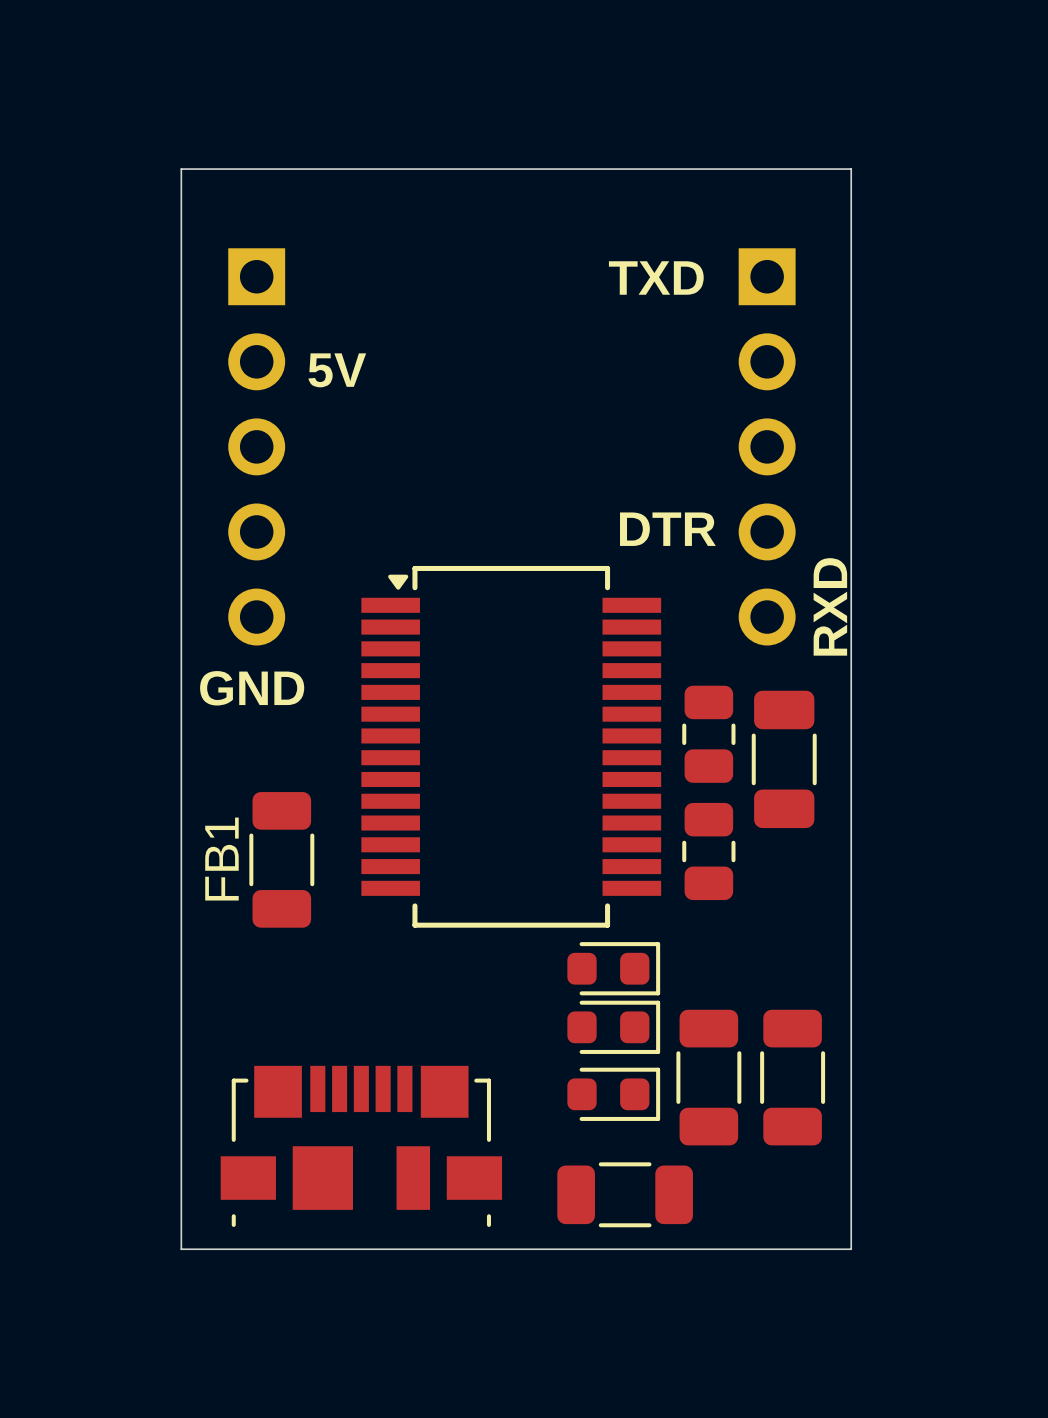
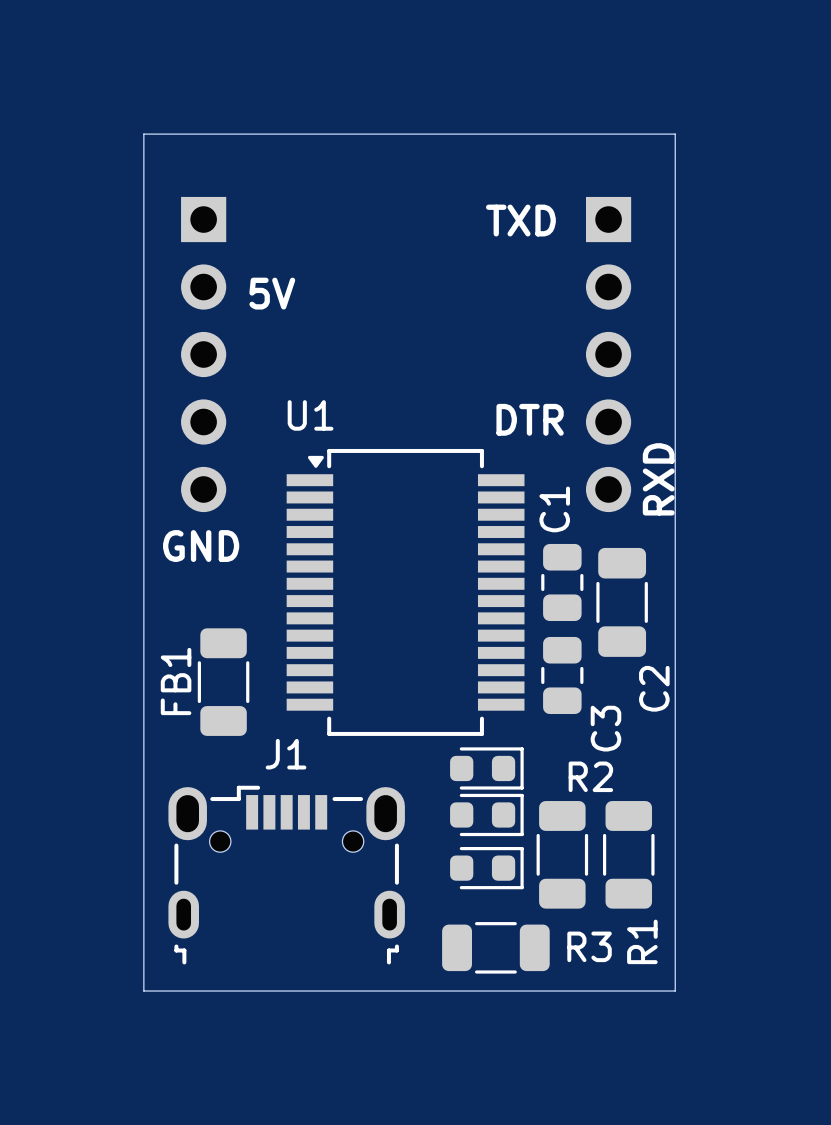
U1 name: none -> U1 (310, 415)
C1 name: none -> C1 (554, 509)
C2 name: none -> C2 (654, 688)
C3 name: none -> C3 (605, 728)
R2 name: none -> R2 (590, 776)
J1: none -> (286, 875)
part: (361, 1146) -> none
R1 name: none -> R1 (642, 941)
R3 name: none -> R3 (589, 946)

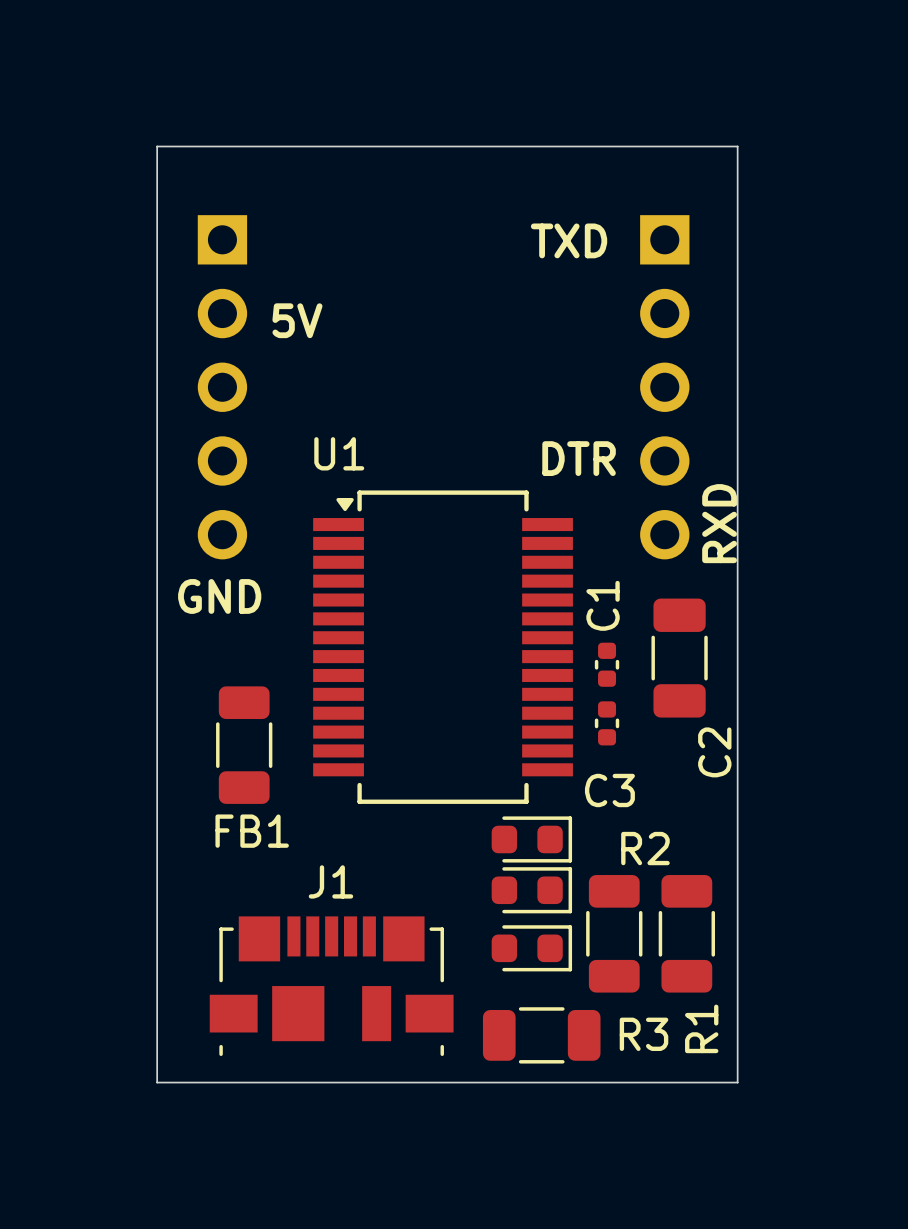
C1 footprint: [541, 543, 584, 622] -> [594, 642, 620, 687]
C3 footprint: [541, 636, 584, 715] -> [594, 701, 620, 746]
FB1 name rotation: 0° (176, 681) -> 90° clockwise (252, 831)
FB1 name position: FB1 (176, 681) -> FB1 (252, 831)
J1 footprint: [168, 785, 405, 965] -> [209, 916, 454, 1057]

